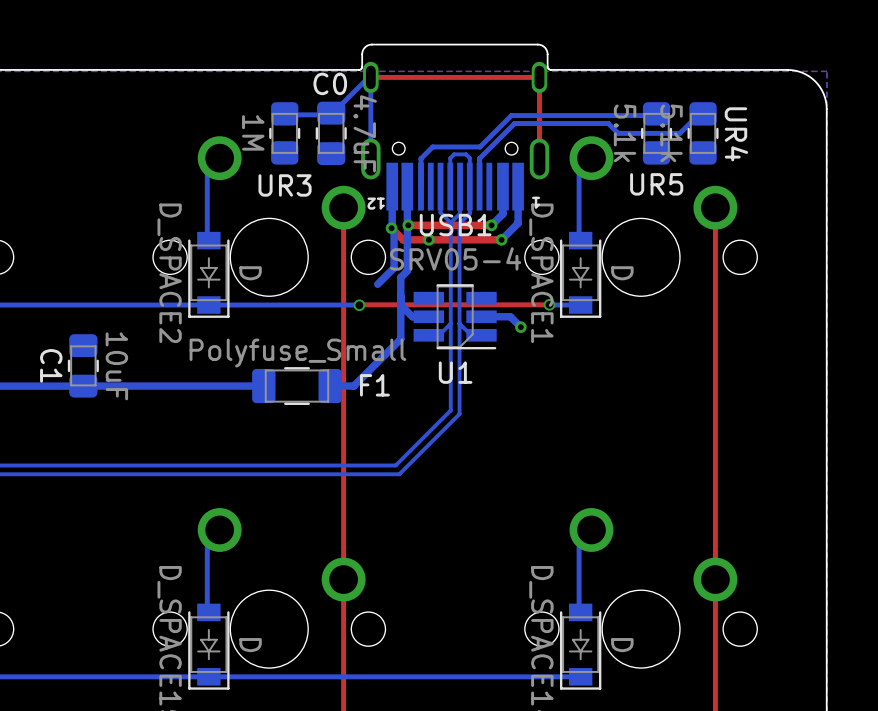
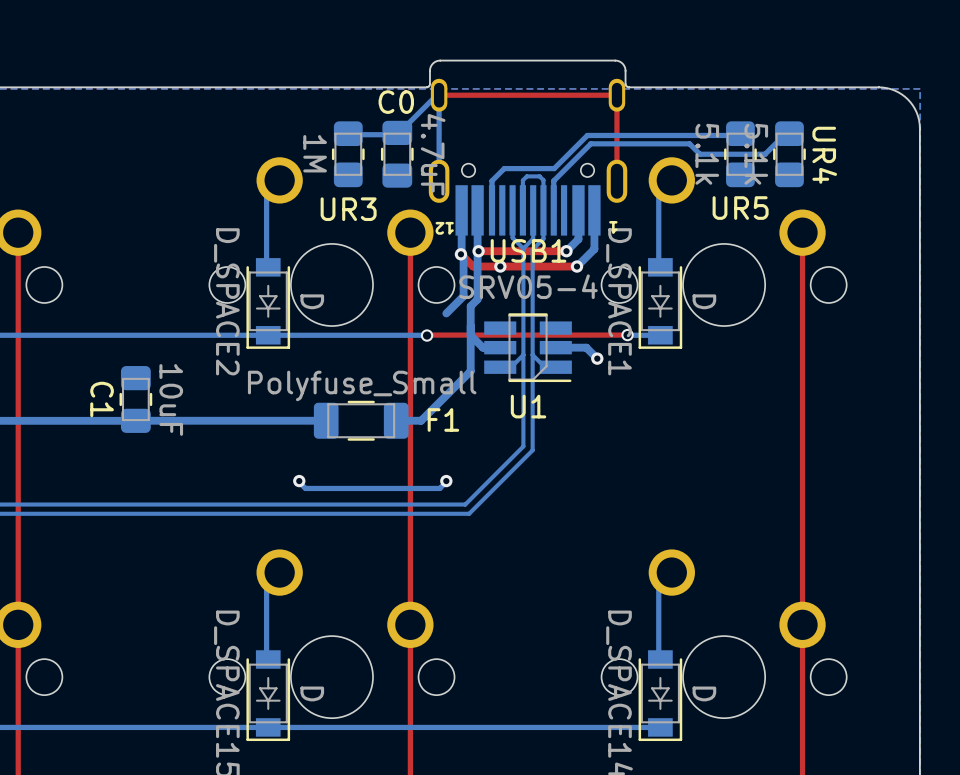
via: none -> (299, 481)
bottom track: none -> (446, 481) (439, 488) (305, 488) (299, 481)
via: none -> (446, 481)

